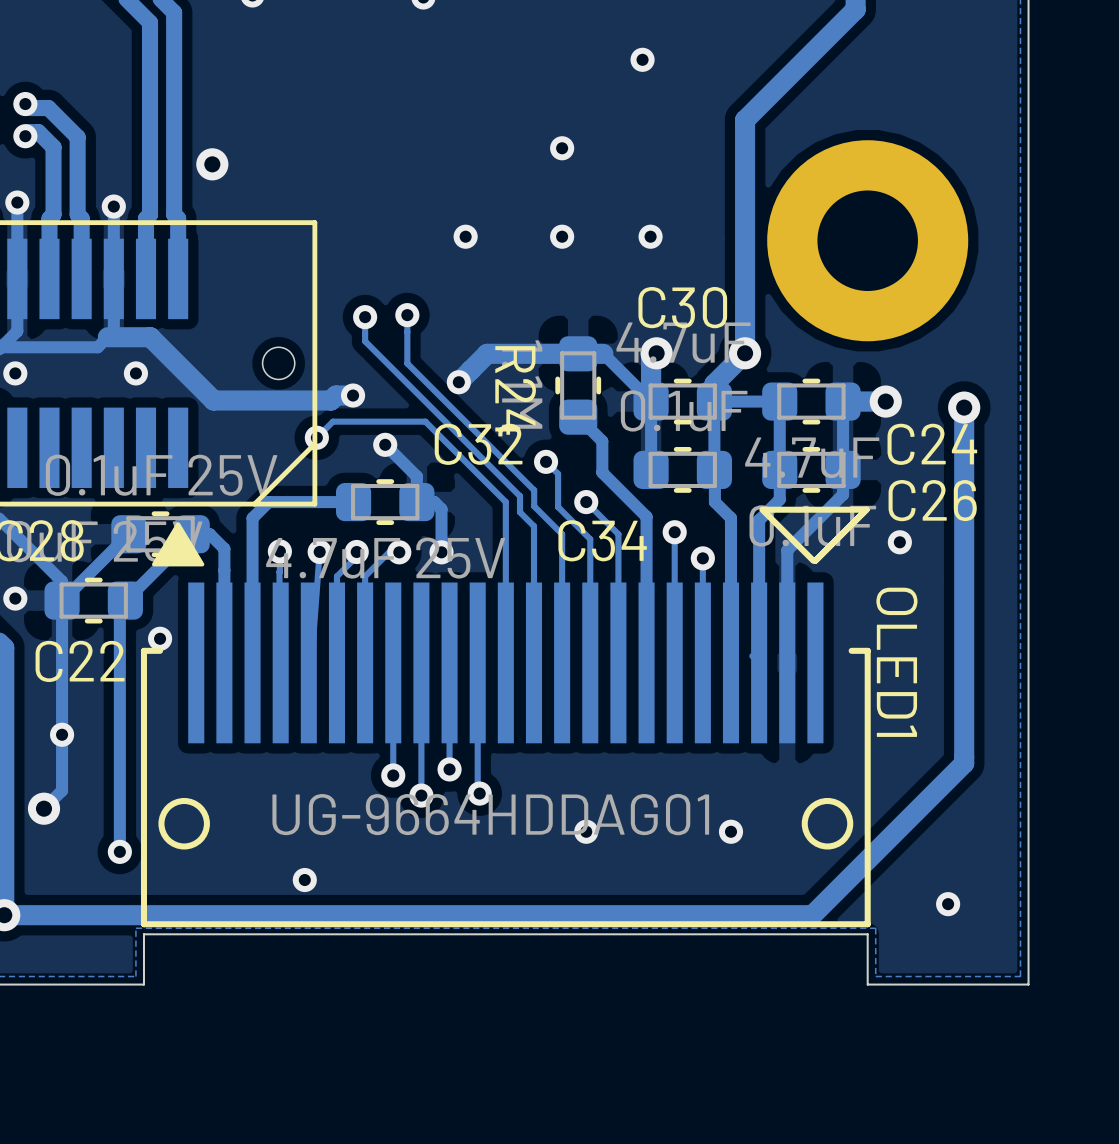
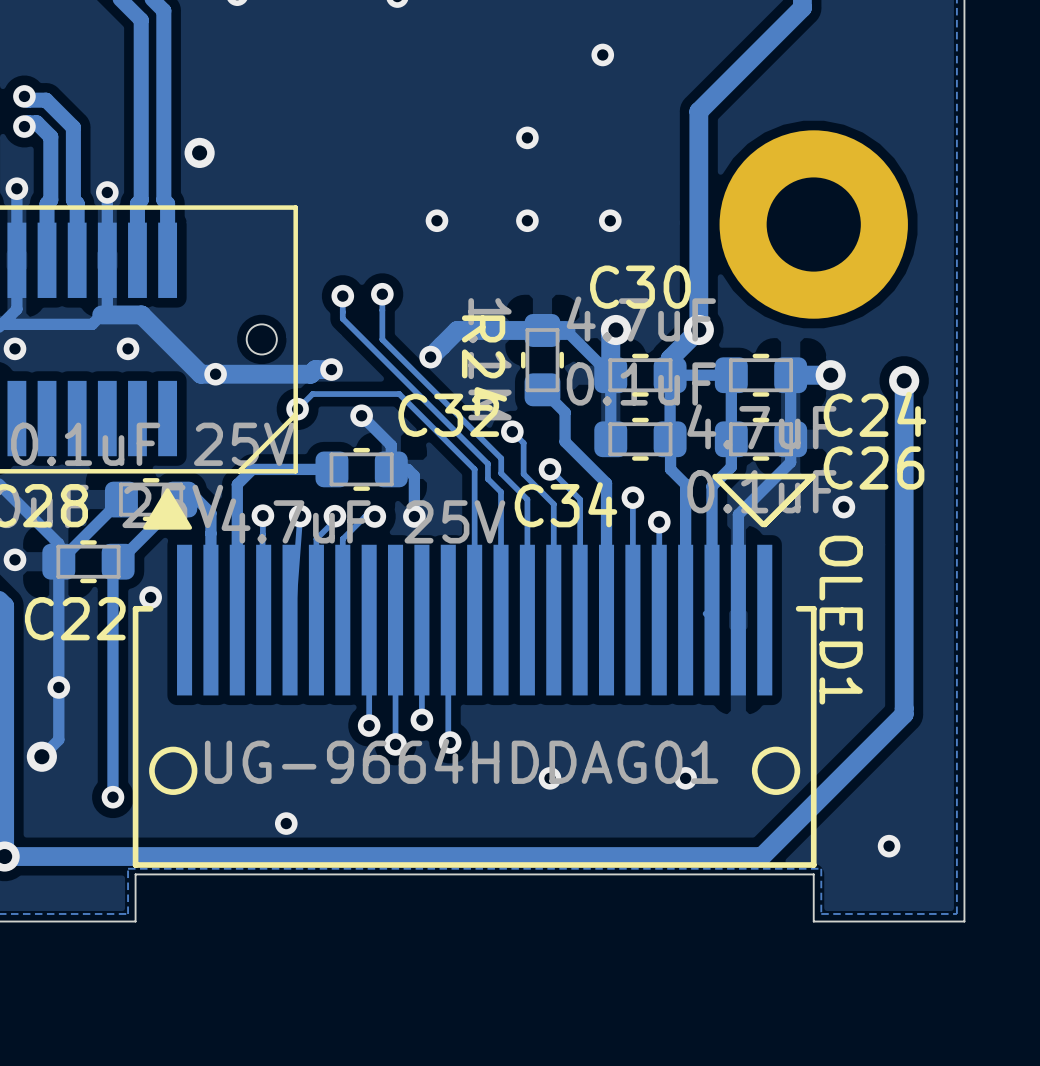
via: none -> (215, 374)

